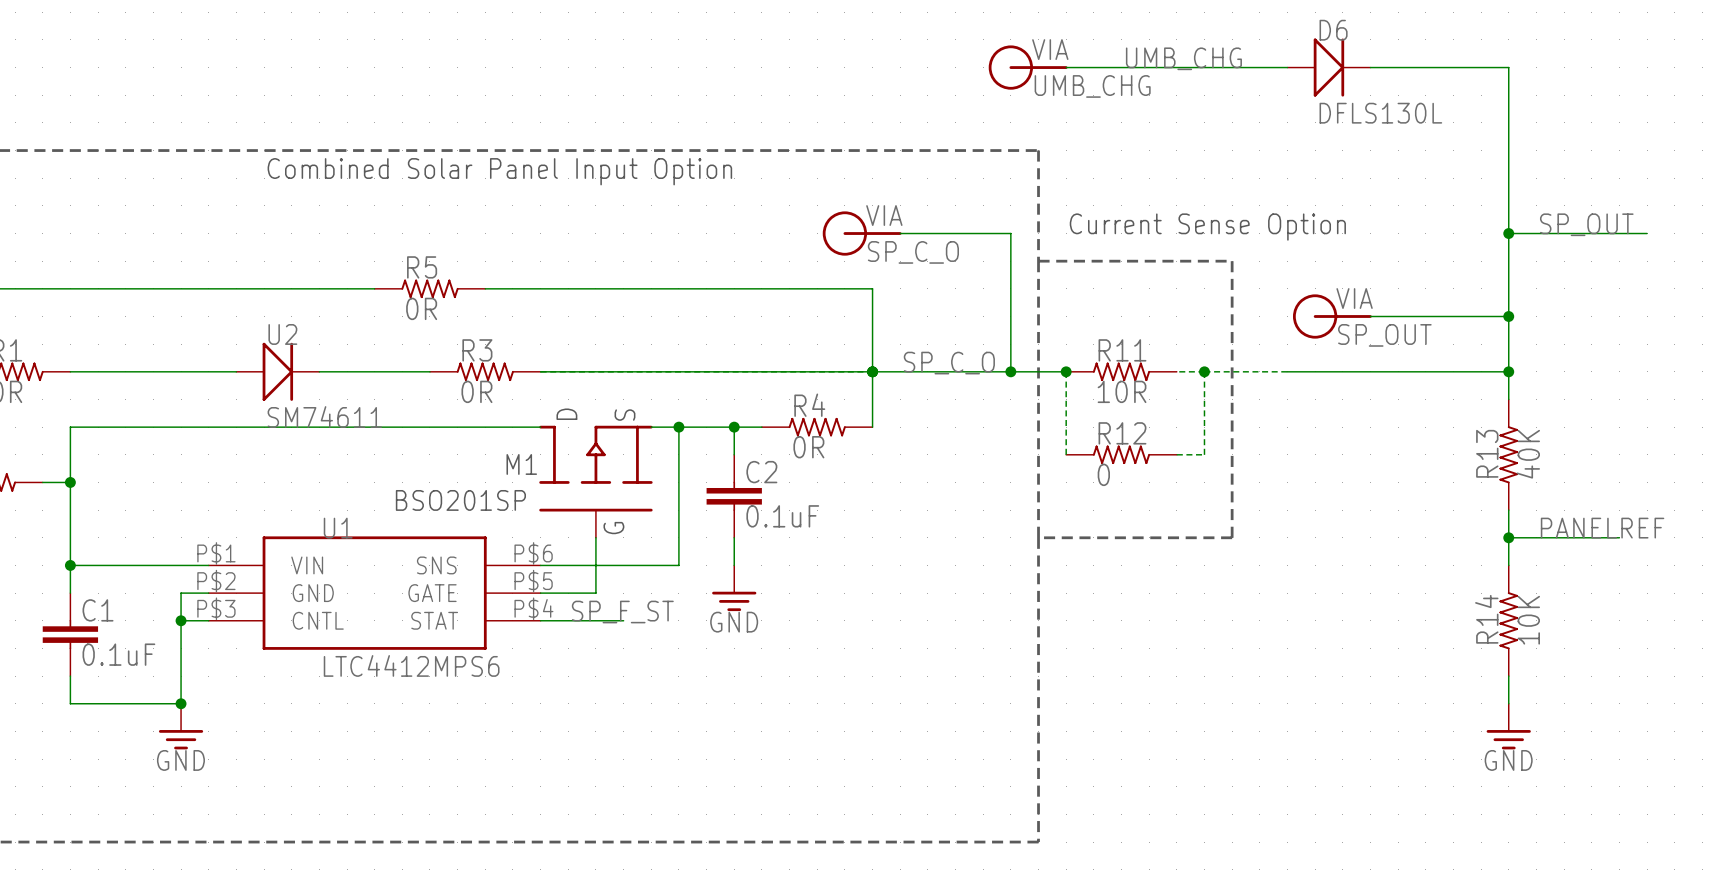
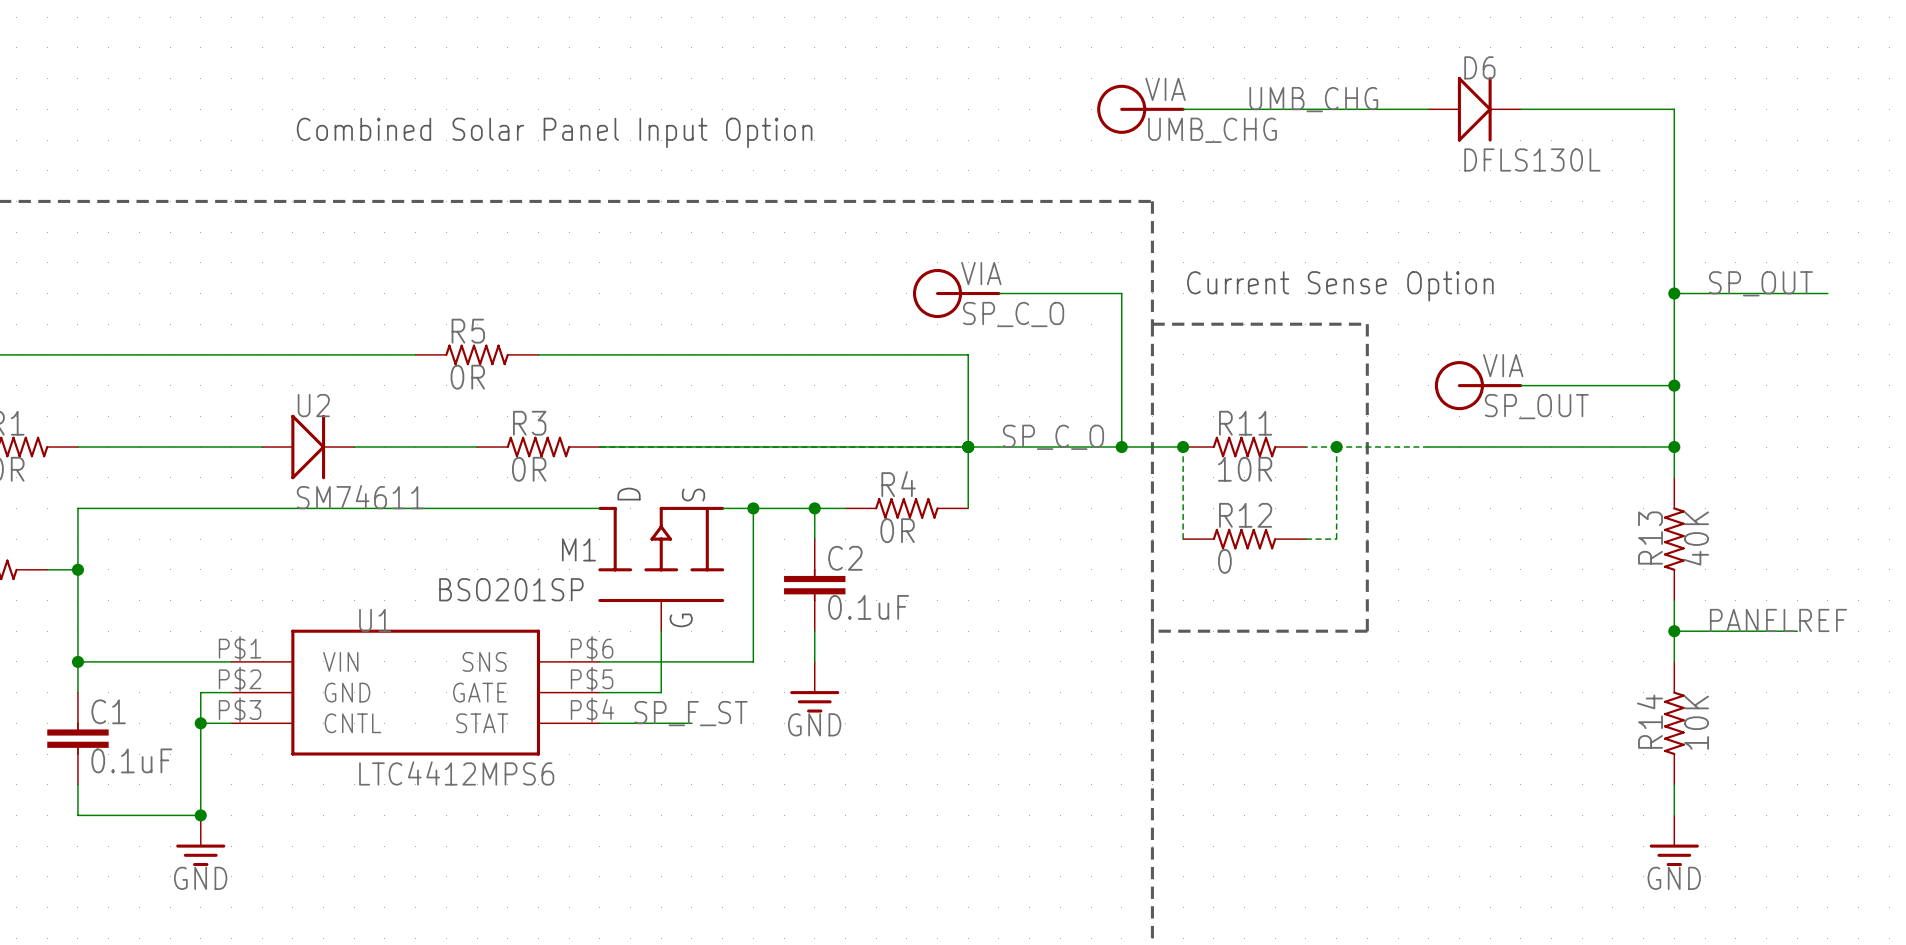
text position: Combined Solar Panel Input Option (499, 171) -> Combined Solar Panel Input Option (554, 132)

